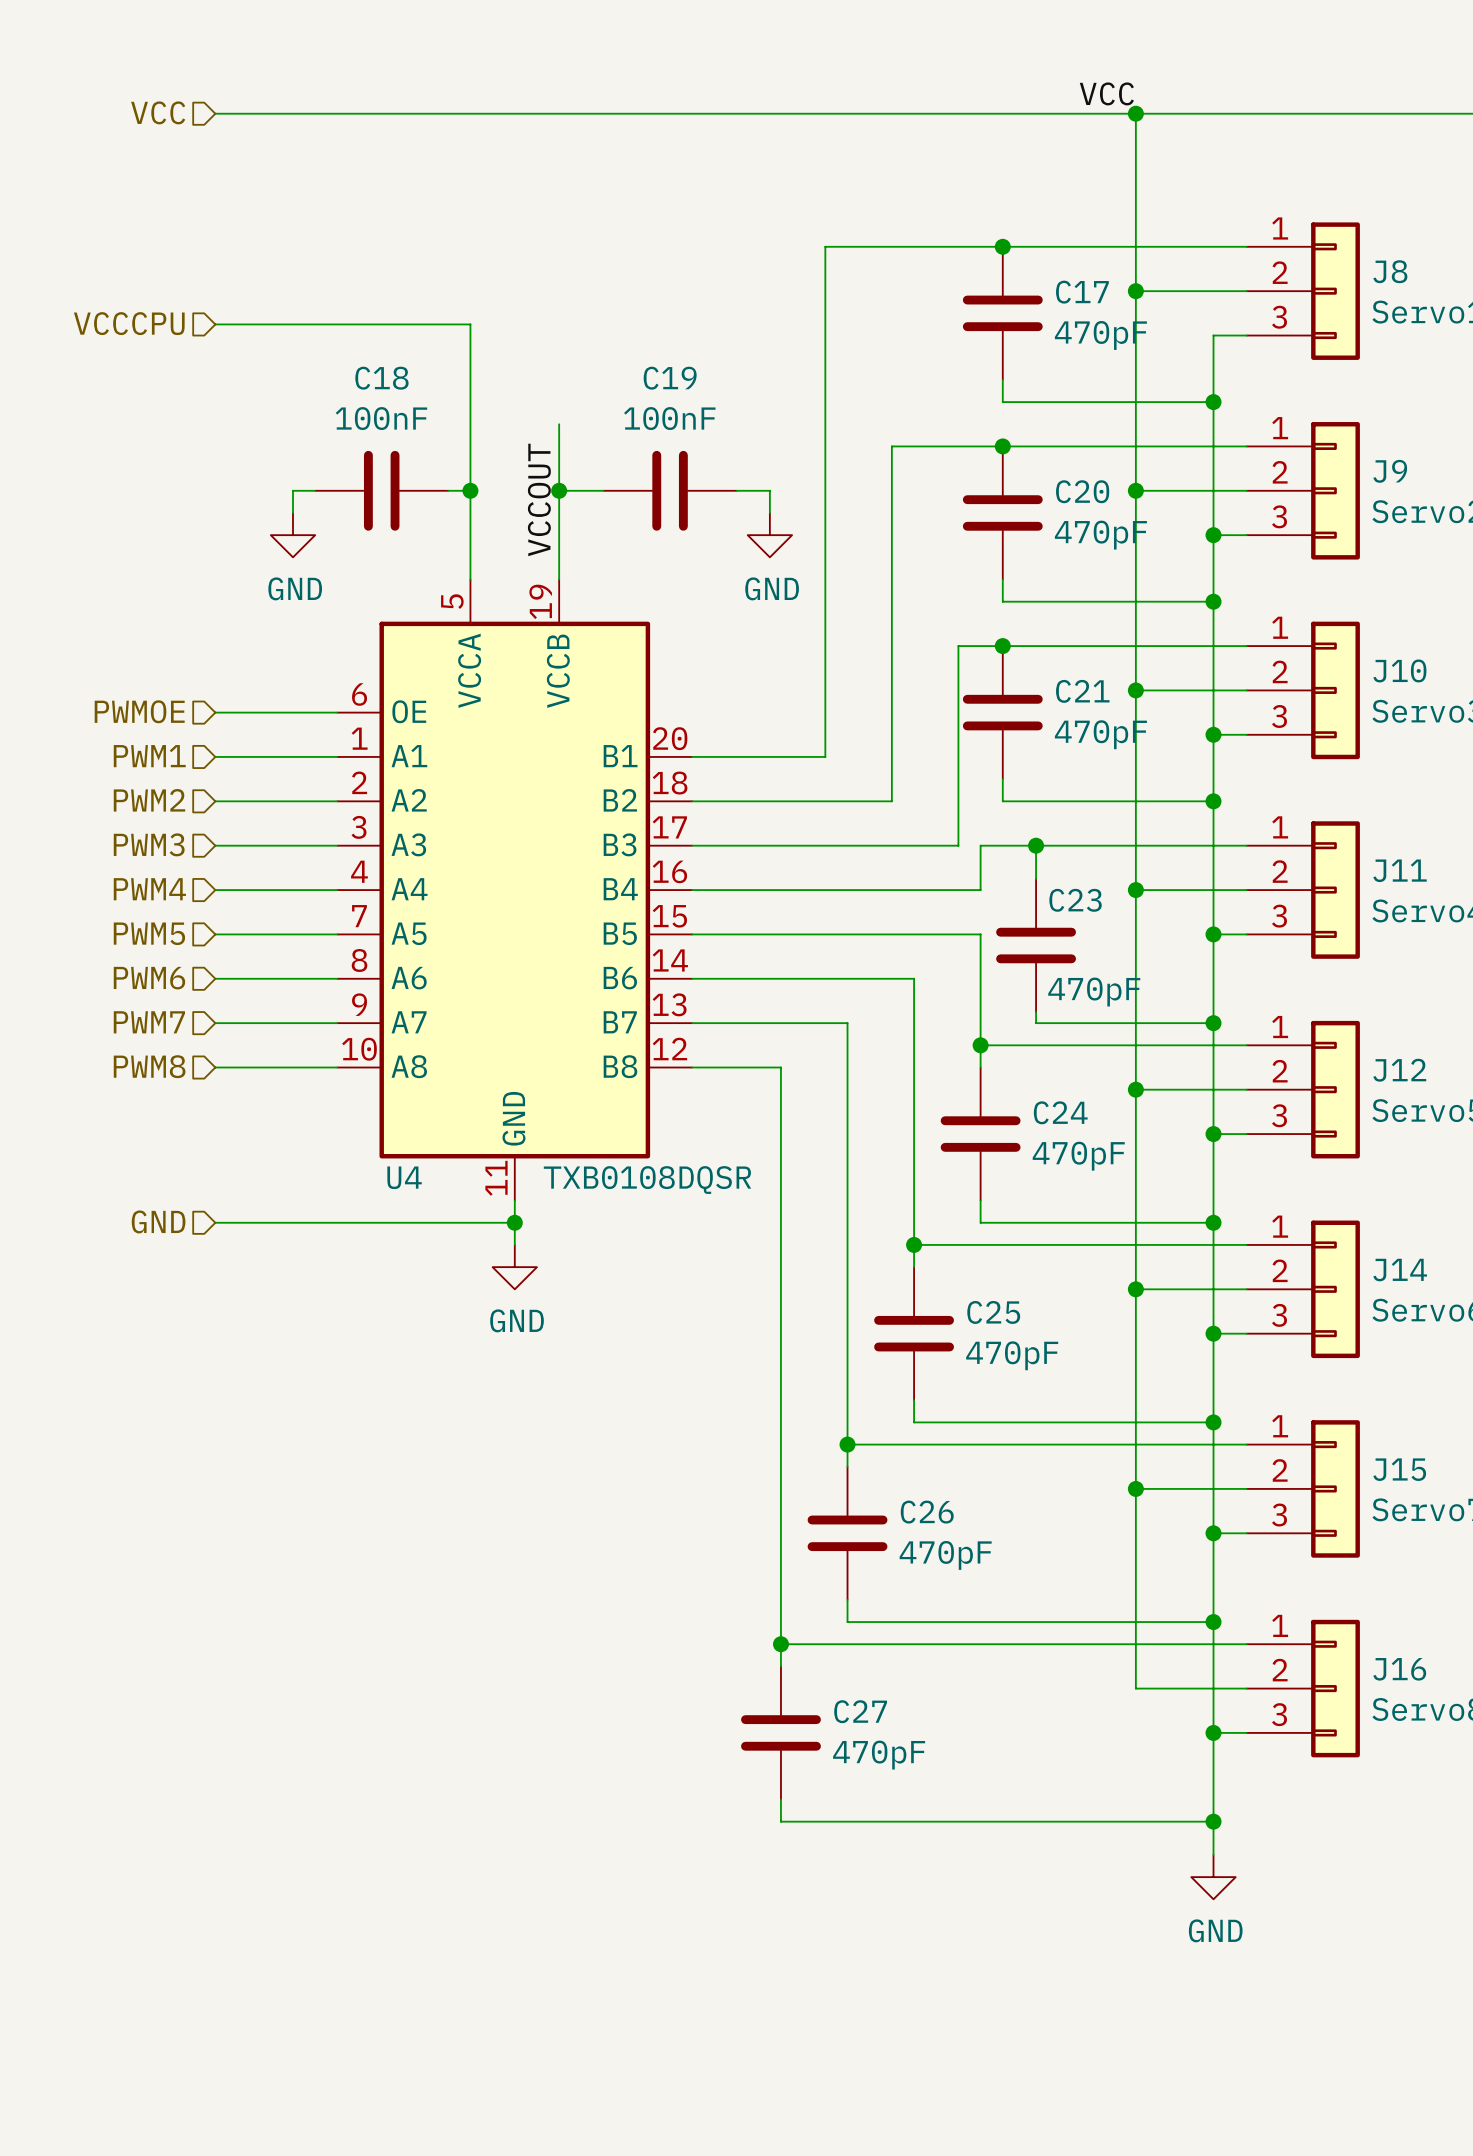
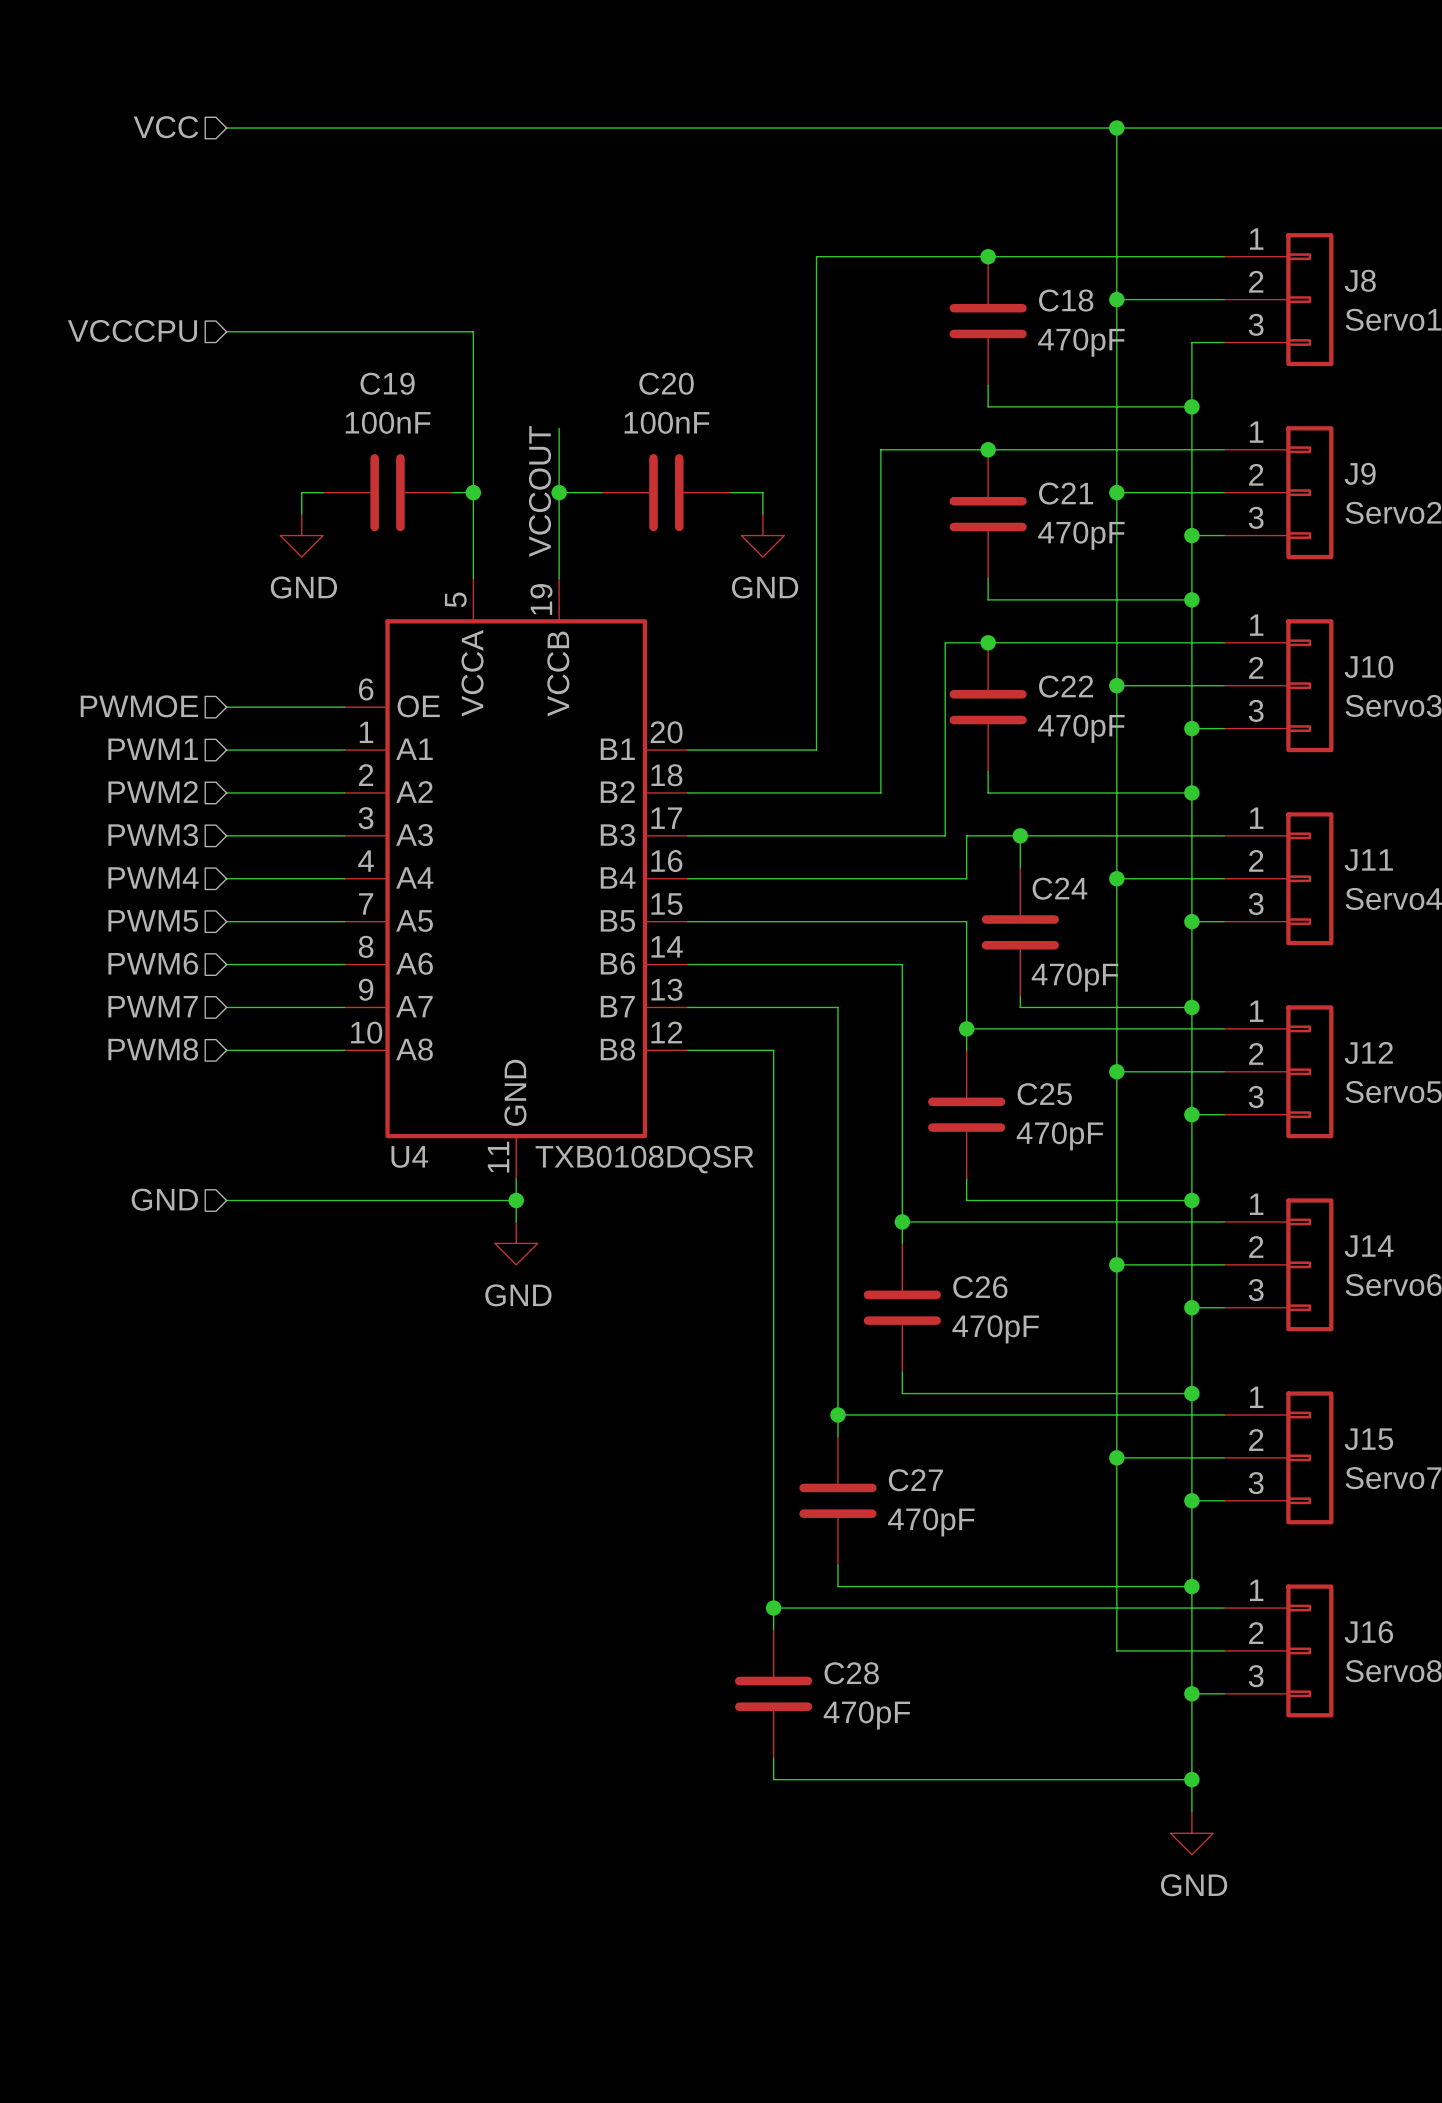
label: VCC (1106, 93) -> none
C17 name: C17 (1082, 292) -> C18 (1066, 300)
C18 name: C18 (381, 378) -> C19 (387, 383)
C19 name: C19 (670, 378) -> C20 (666, 383)
C20 name: C20 (1082, 491) -> C21 (1066, 493)
C21 name: C21 (1082, 691) -> C22 (1066, 686)
C23 name: C23 (1075, 900) -> C24 (1059, 888)
C24 name: C24 (1060, 1112) -> C25 (1044, 1094)
C25 name: C25 (993, 1312) -> C26 (980, 1287)
C26 name: C26 (927, 1512) -> C27 (915, 1480)
C27 name: C27 (860, 1711) -> C28 (851, 1673)

